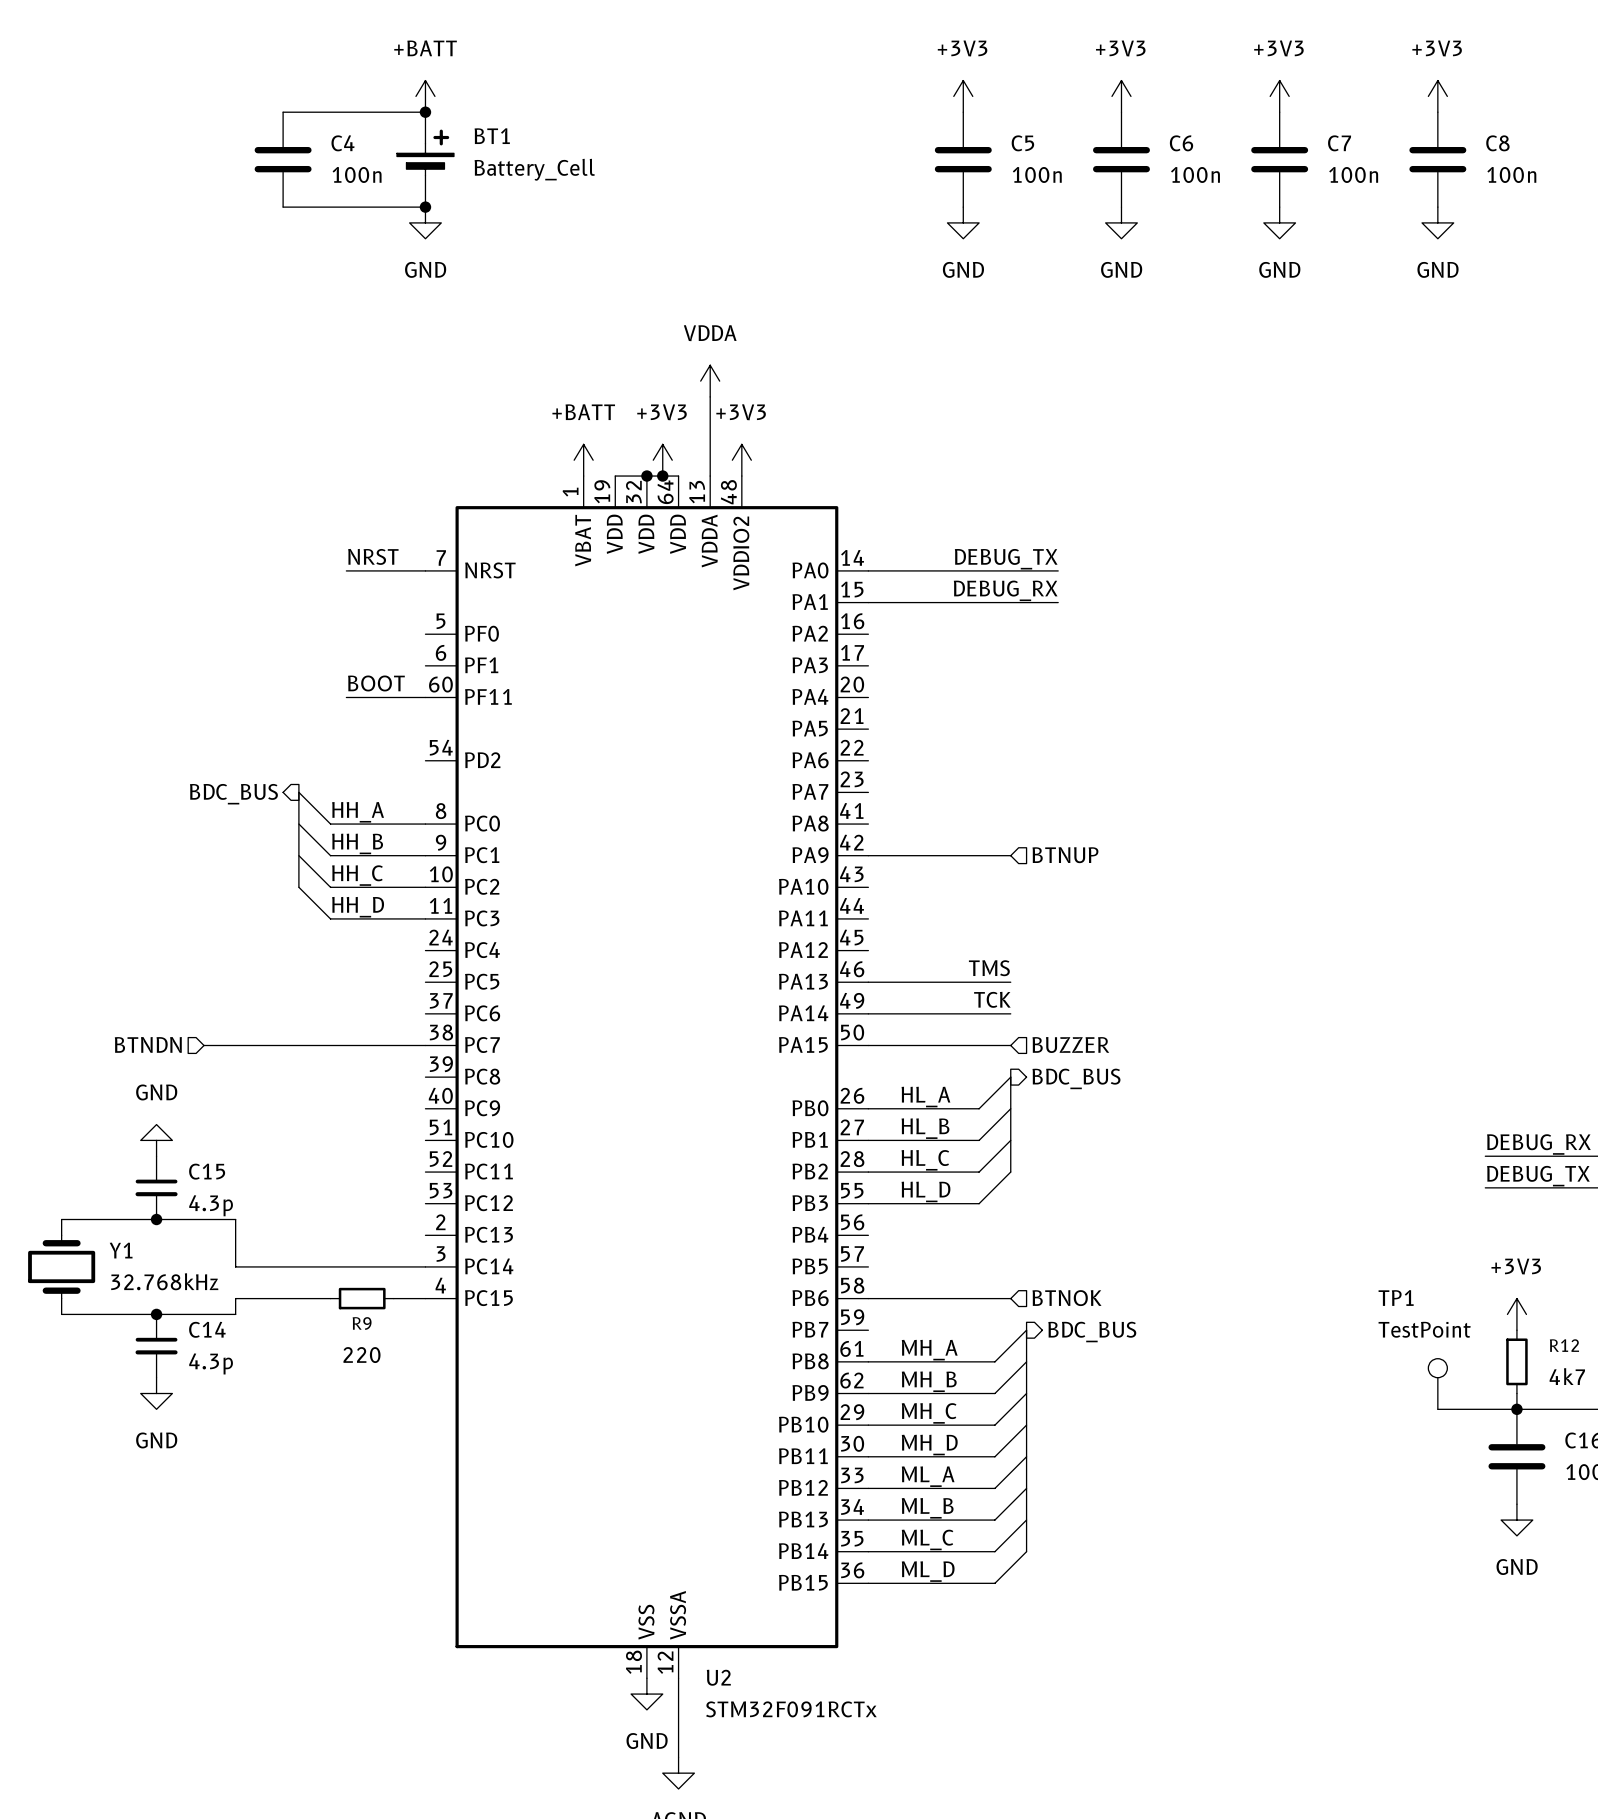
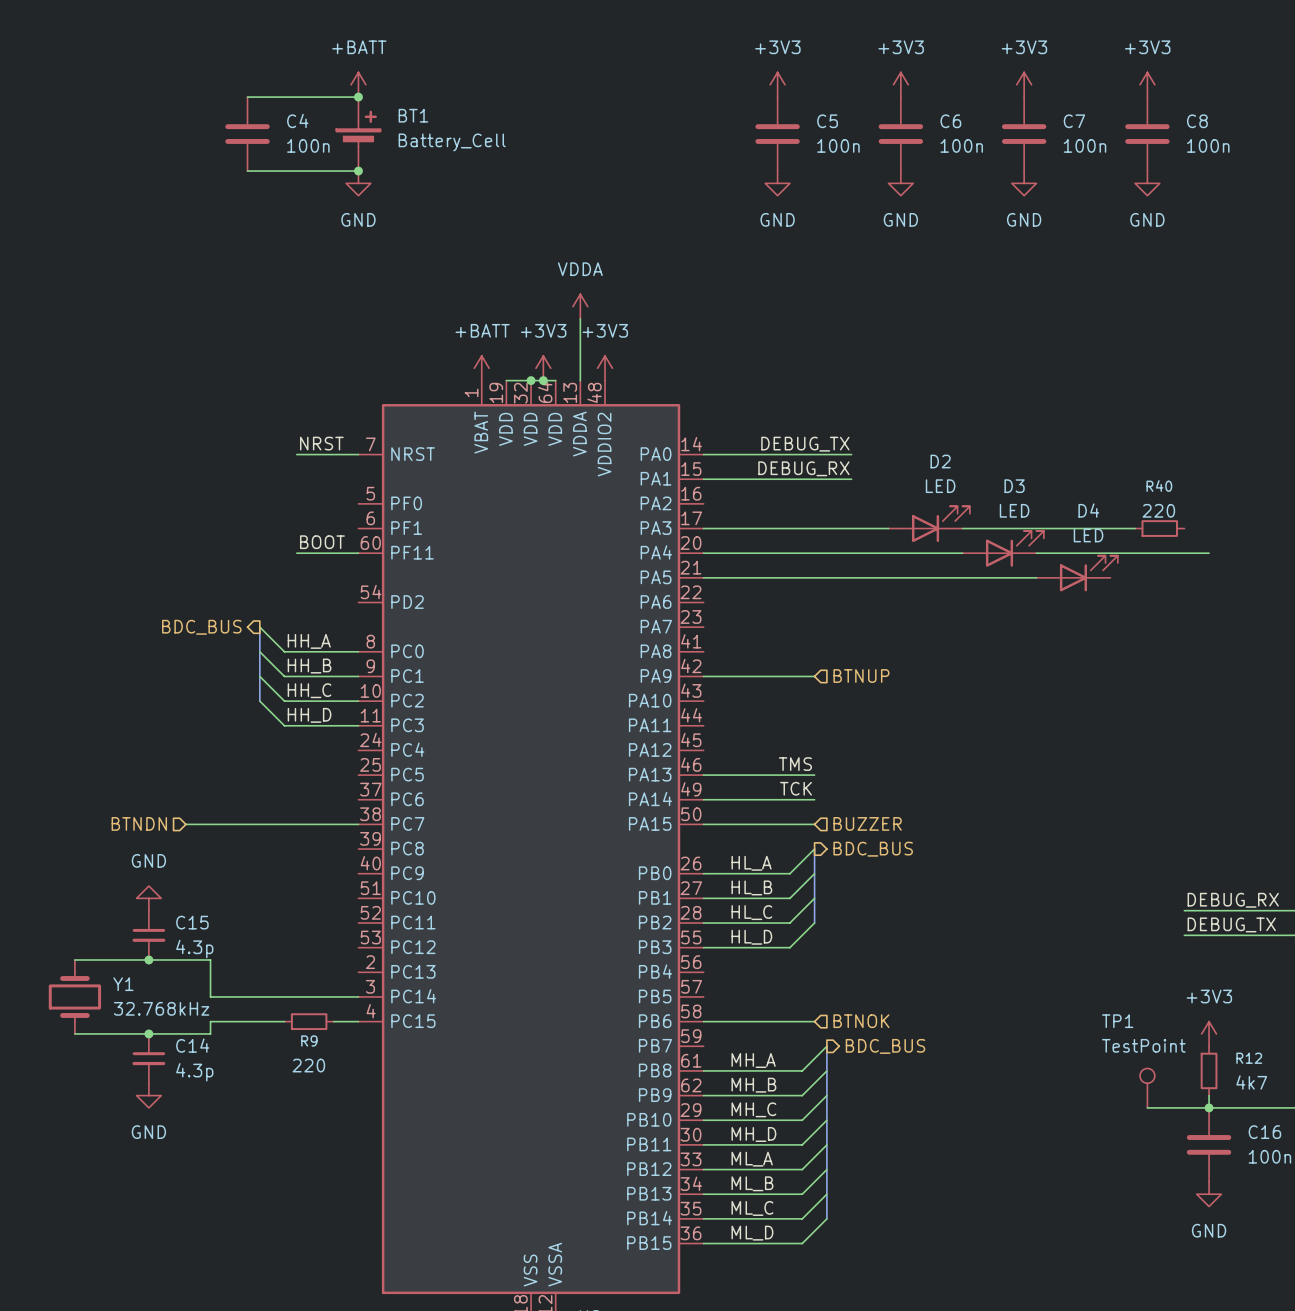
D2: none -> LED (929, 524)
wire: none -> (703, 528) (888, 528)
wire: none -> (962, 528) (1135, 528)
R40: none -> 220 (1159, 528)
D3: none -> LED (1003, 548)
wire: none -> (703, 553) (962, 553)
wire: none -> (1036, 553) (1209, 553)
D4: none -> LED (1077, 573)
wire: none -> (703, 577) (1036, 577)

